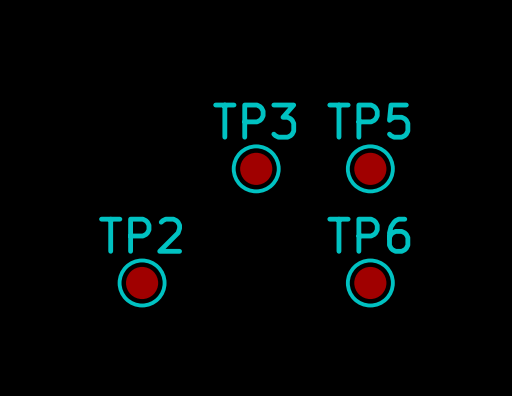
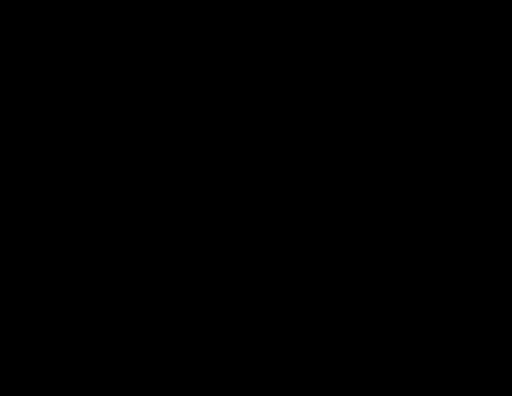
TP3: (256, 168) -> none
TP5: (370, 168) -> none
TP2: (142, 282) -> none
TP6: (370, 282) -> none

